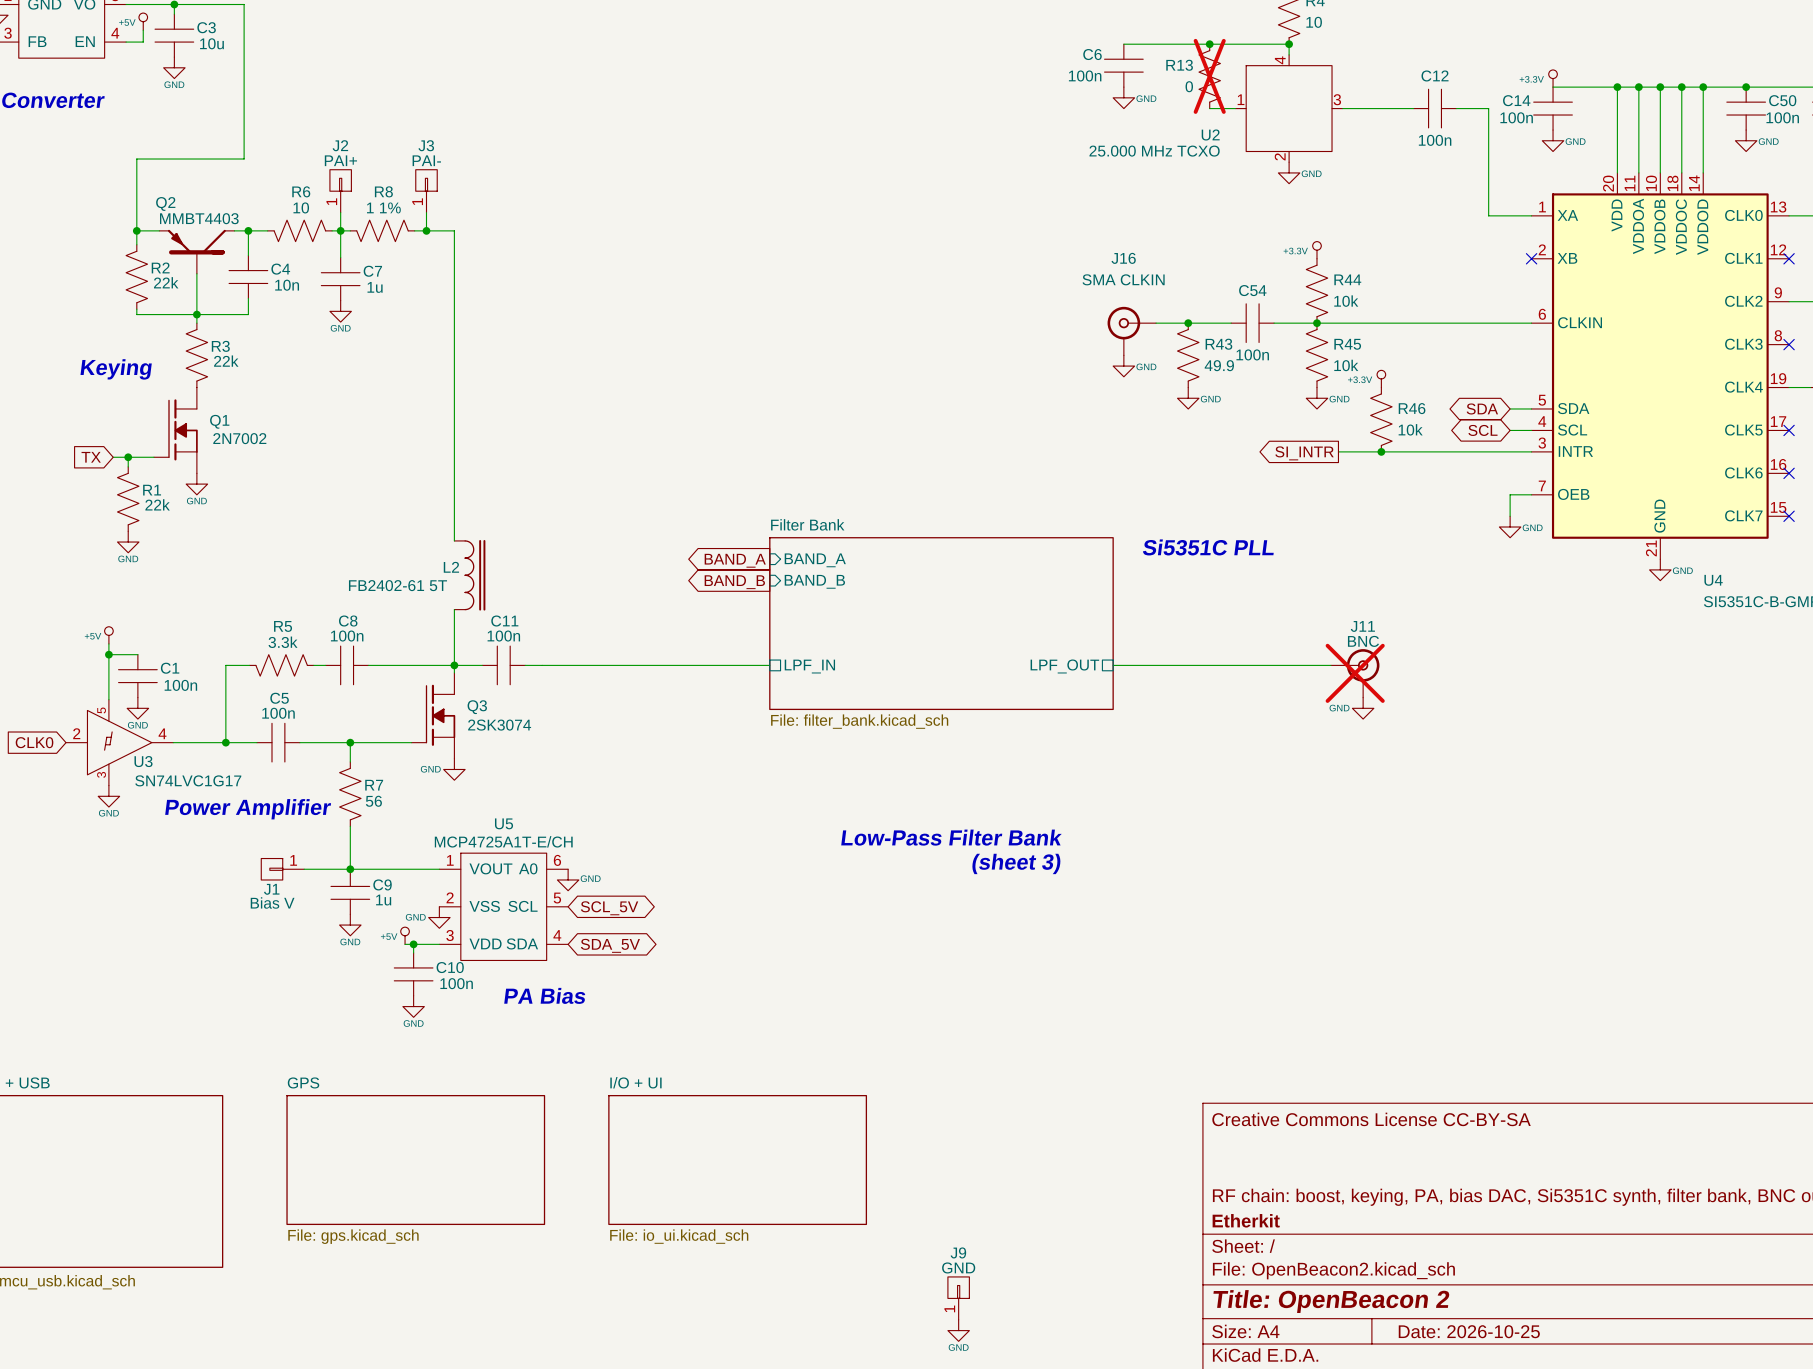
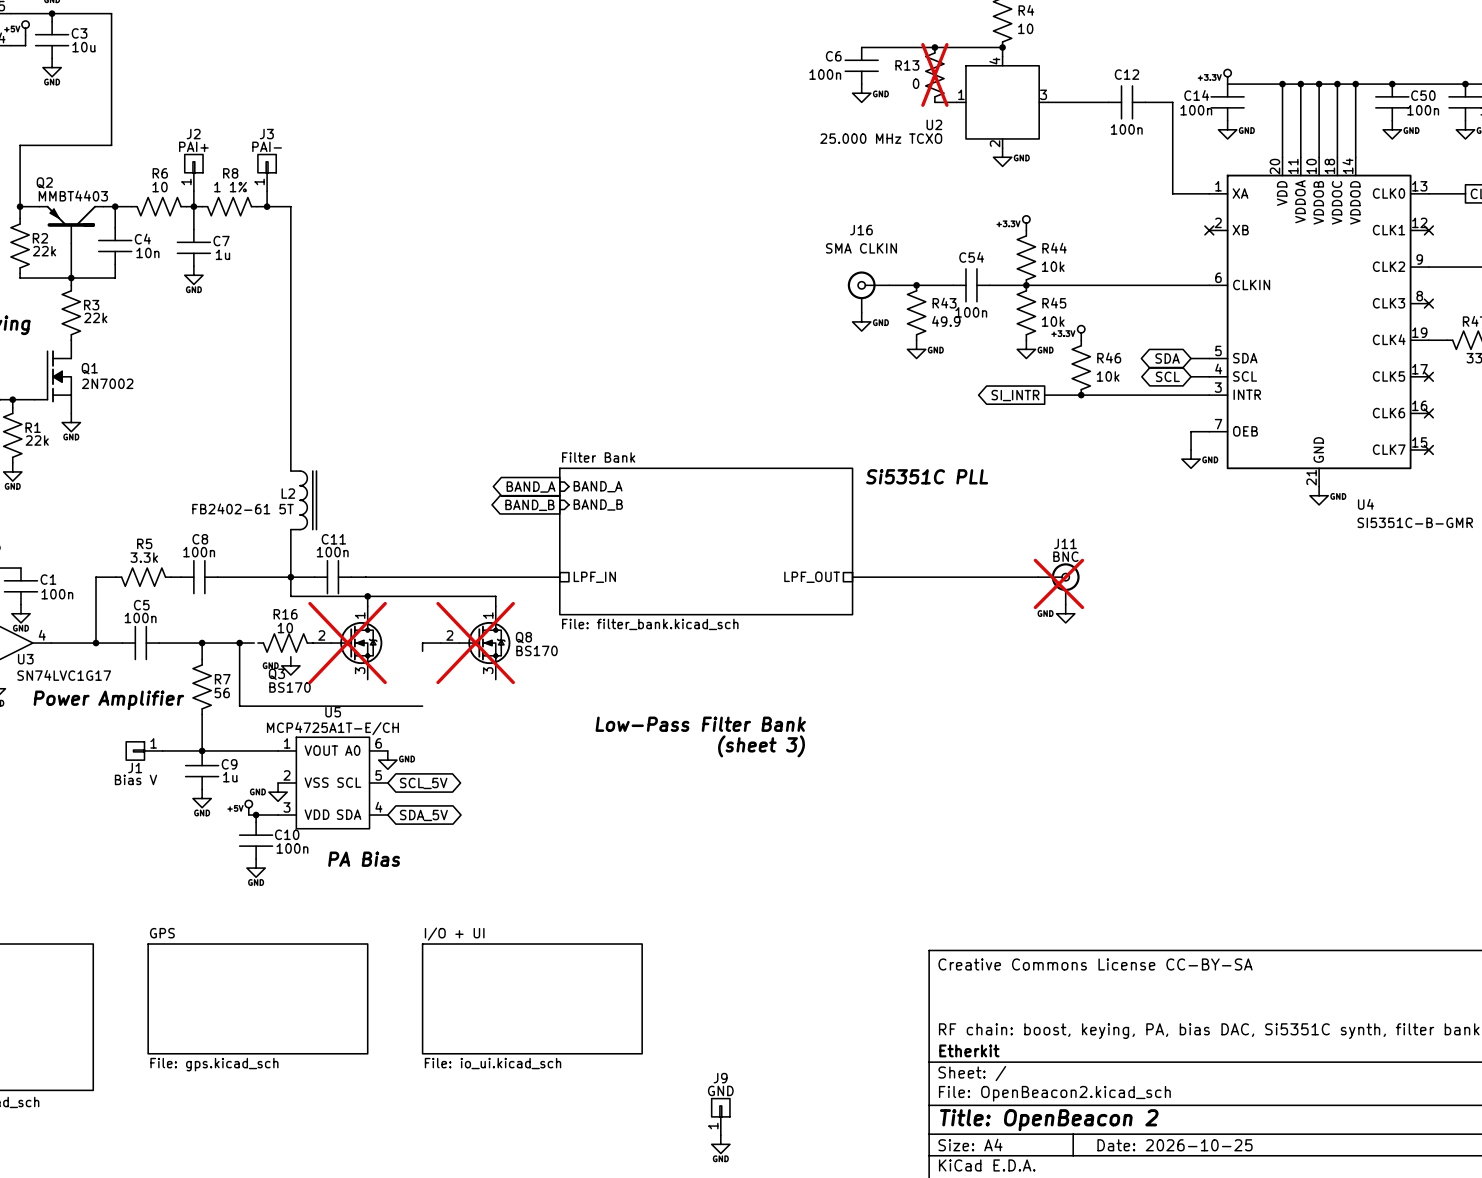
Q3 symbol: [411, 672, 456, 759] -> [312, 606, 383, 680]
wire: none -> (290, 583) (290, 596) (495, 596) (495, 606)
wire: none -> (367, 596) (367, 606)
junction: none -> (367, 596)
Q3 name position: Q3 (477, 707) -> Q3 (276, 674)
Q3 value: 2SK3074 (499, 725) -> BS170 (290, 687)
wire: none -> (239, 643) (239, 706) (422, 706)
junction: none -> (239, 643)
R16: none -> 10 (285, 643)
Q3 do-not-place cross: none -> (347, 643)
wire: none -> (440, 643) (422, 643) (422, 651)
Q8: none -> BS170 (475, 643)

